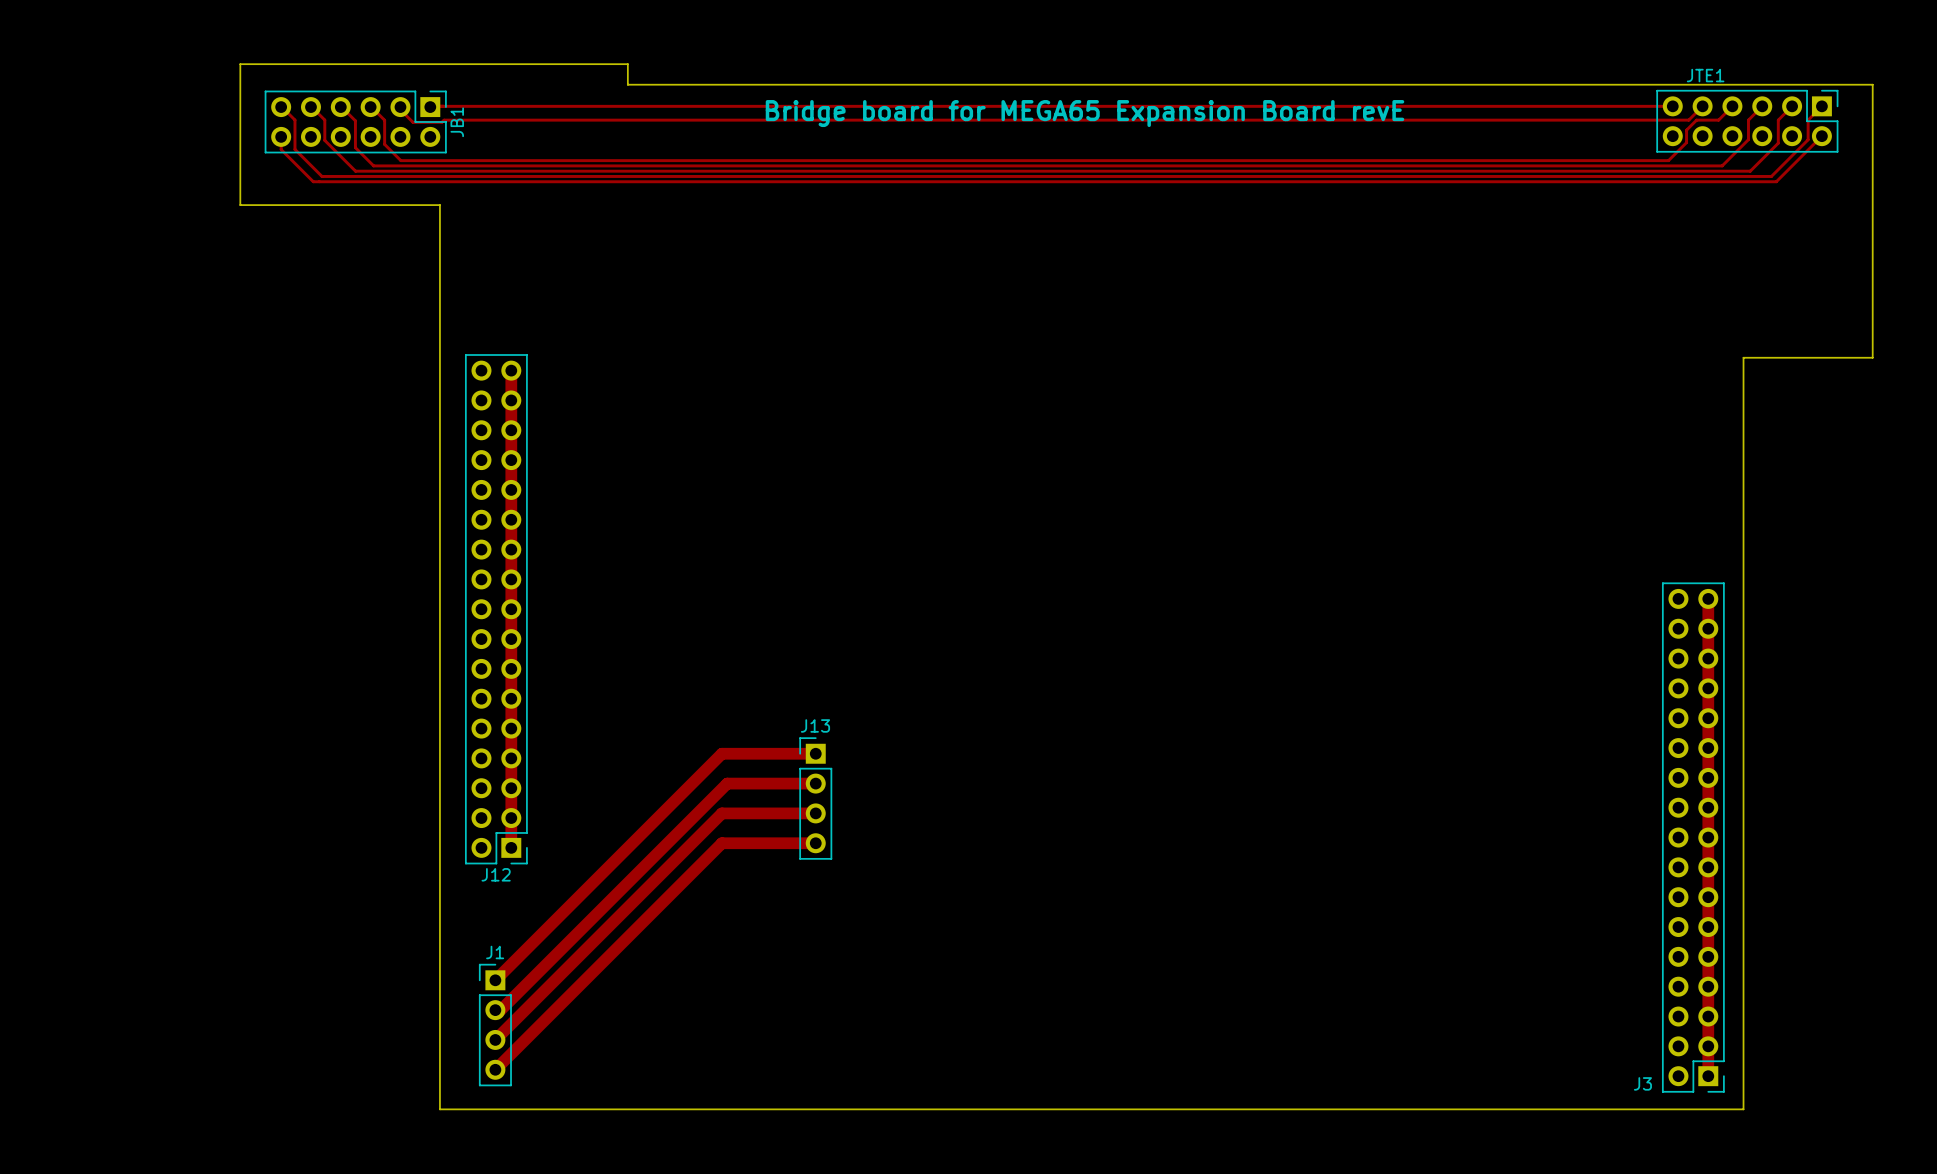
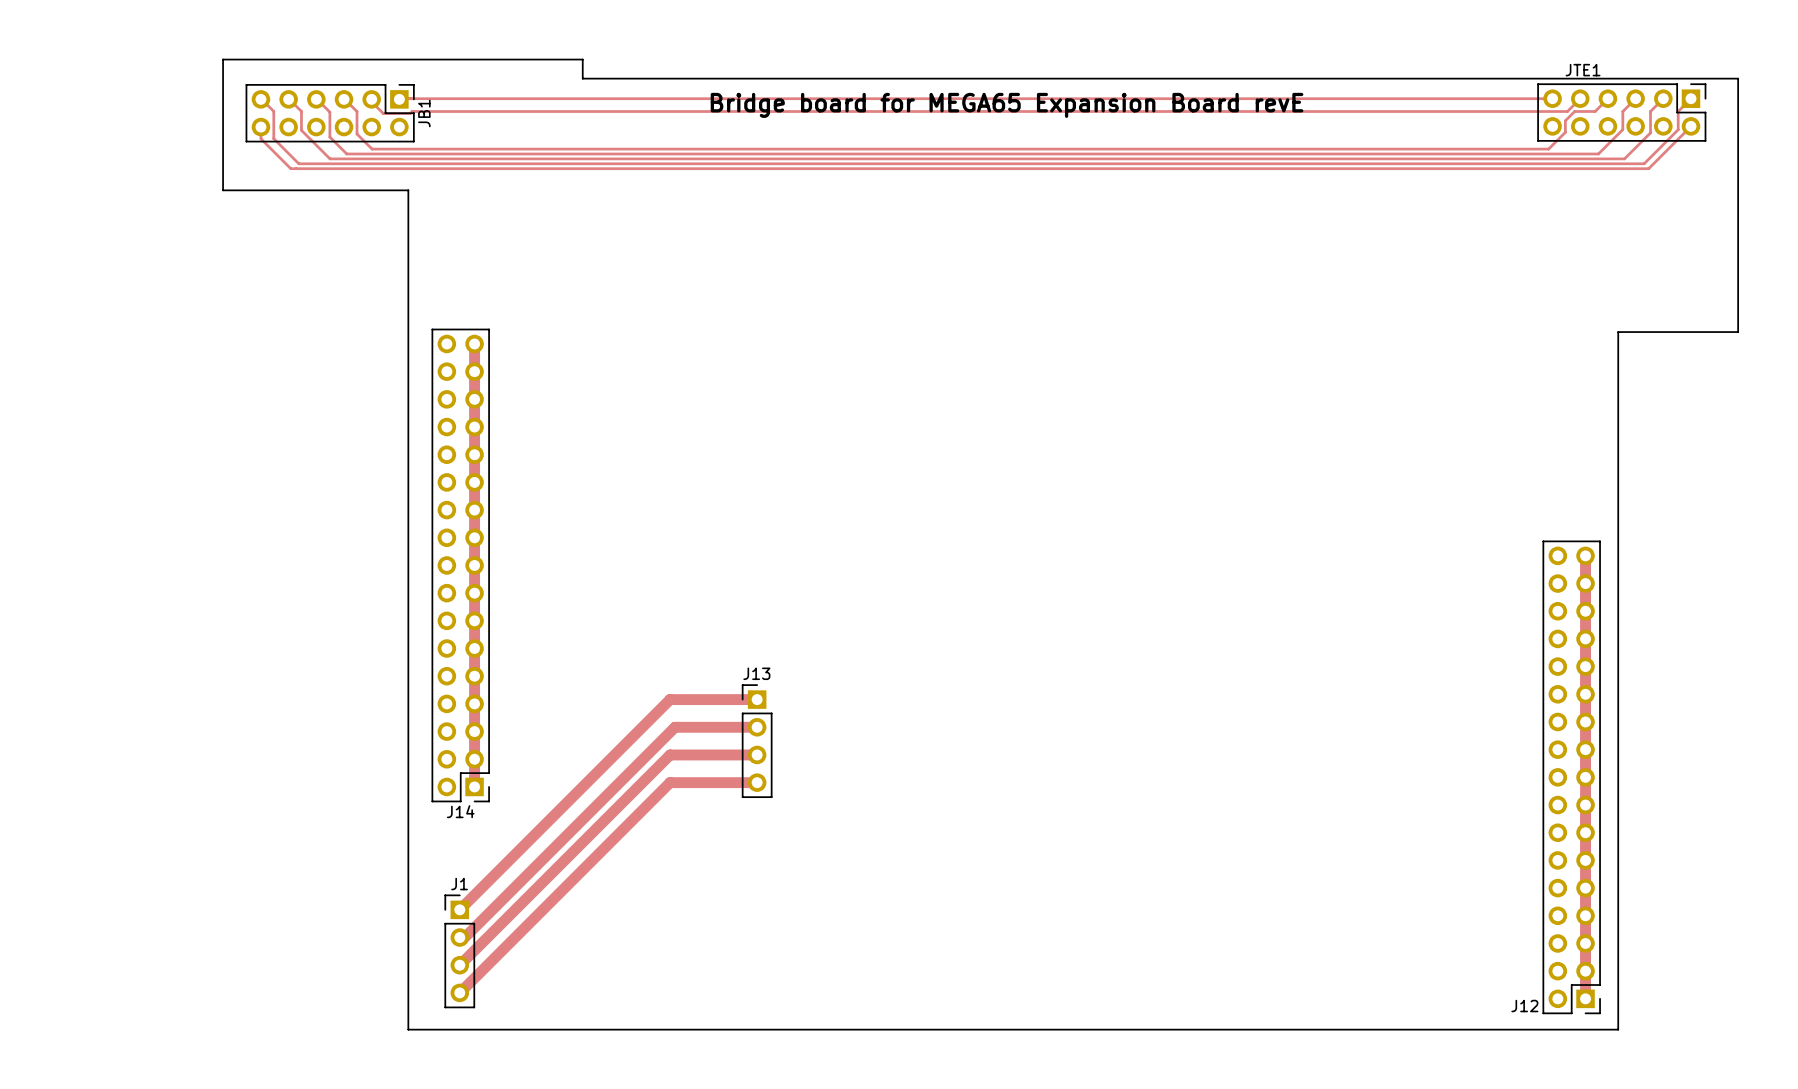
J12 name: J12 (496, 874) -> J14 (460, 811)
J3 name: J3 (1642, 1083) -> J12 (1524, 1006)

